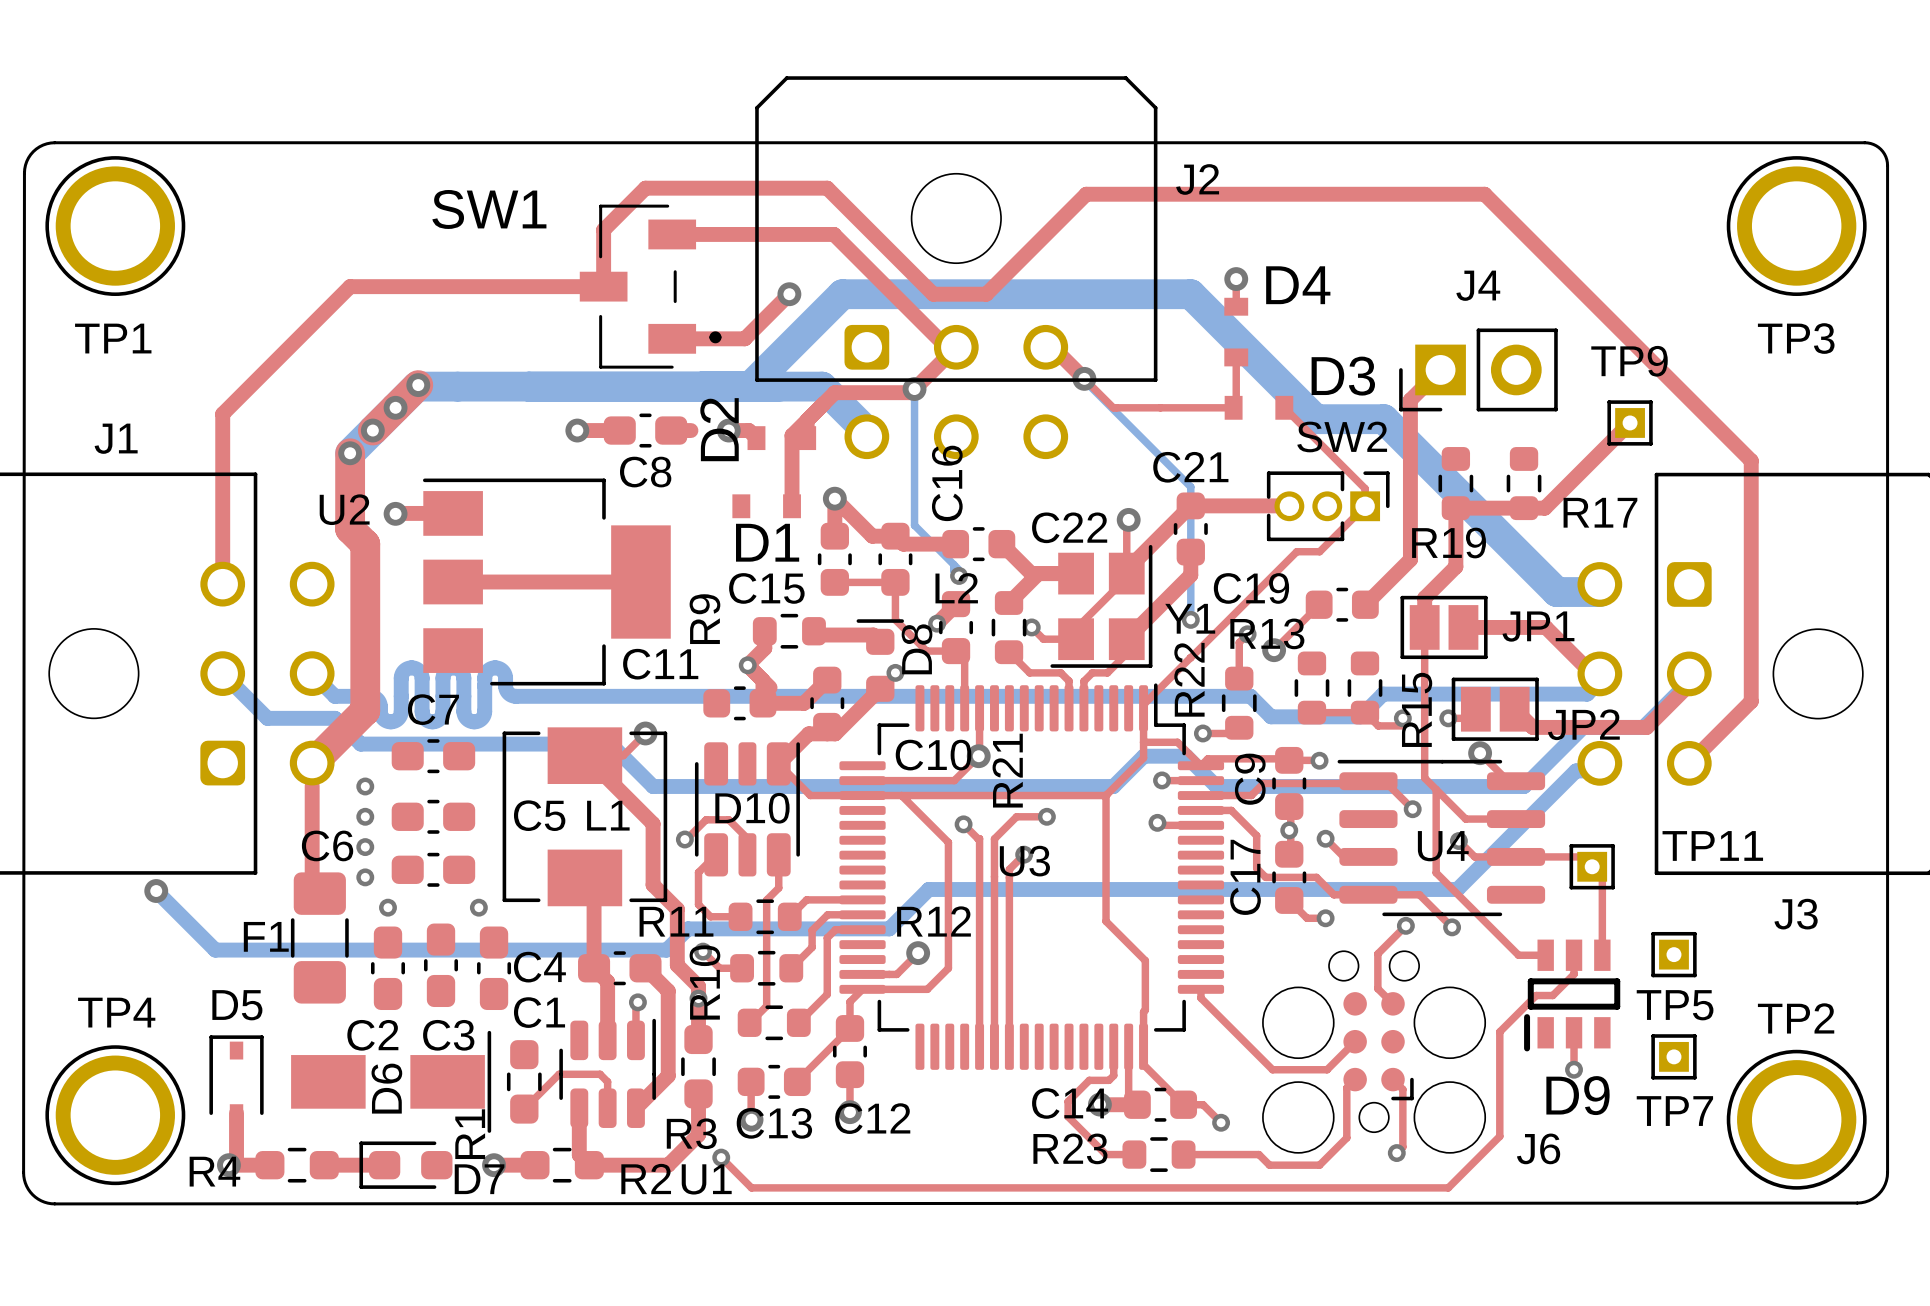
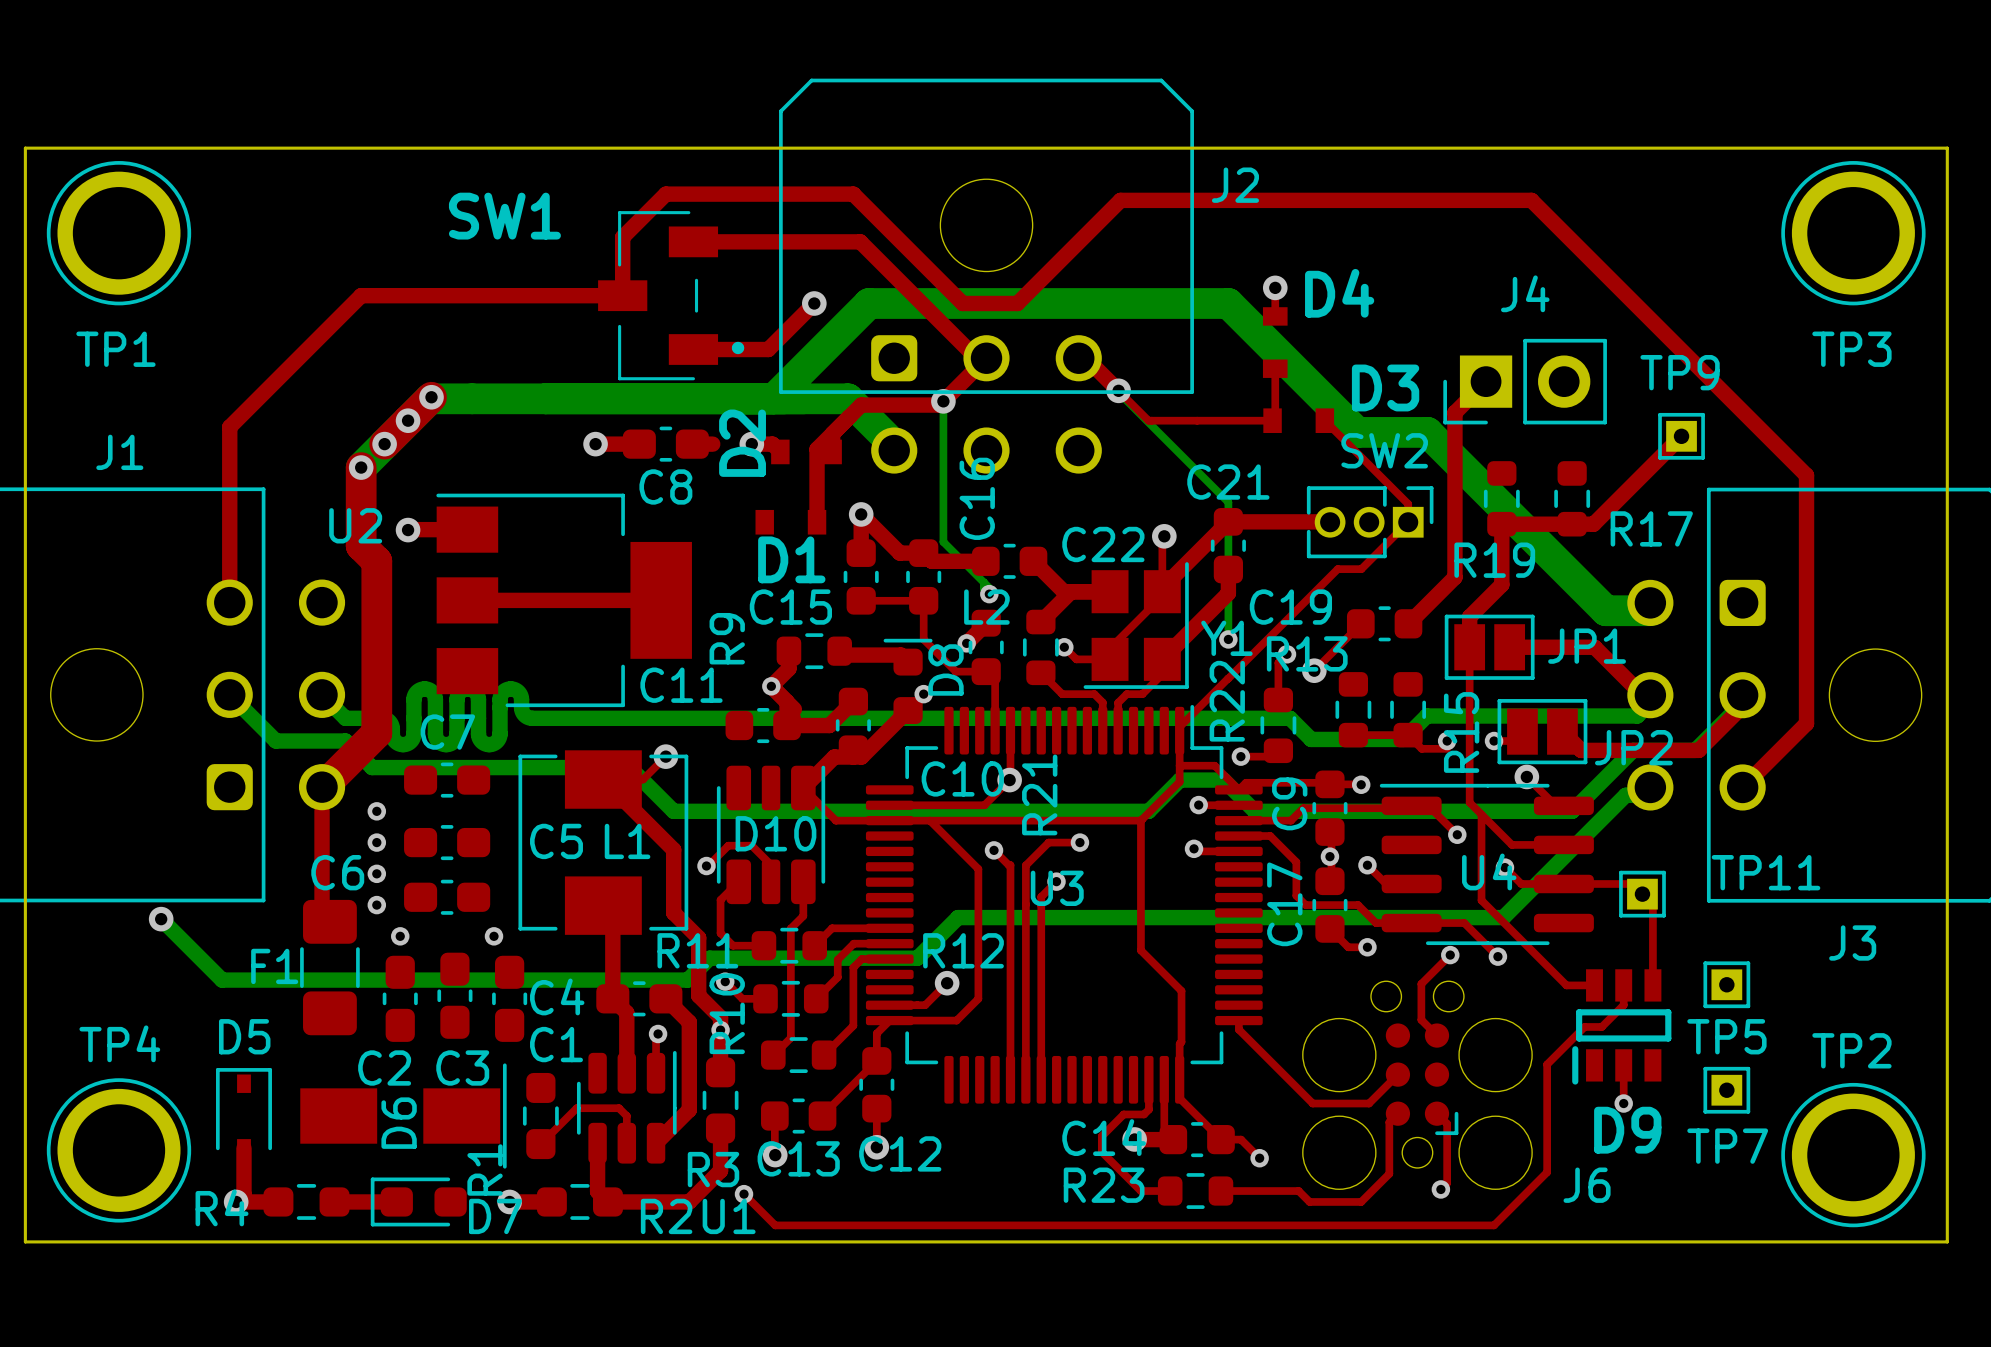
board edge: (54, 142) (1864, 142) (1876, 145) (1884, 154) (1887, 165) (1887, 1172) (1883, 1187) (1872, 1198) (1857, 1203) (54, 1203) (38, 1199) (28, 1189) (23, 1172) (24, 173) (26, 161) (33, 151) (43, 145) (54, 142) -> (25, 148) (25, 1241) (1947, 1241) (1947, 148) (25, 148)

